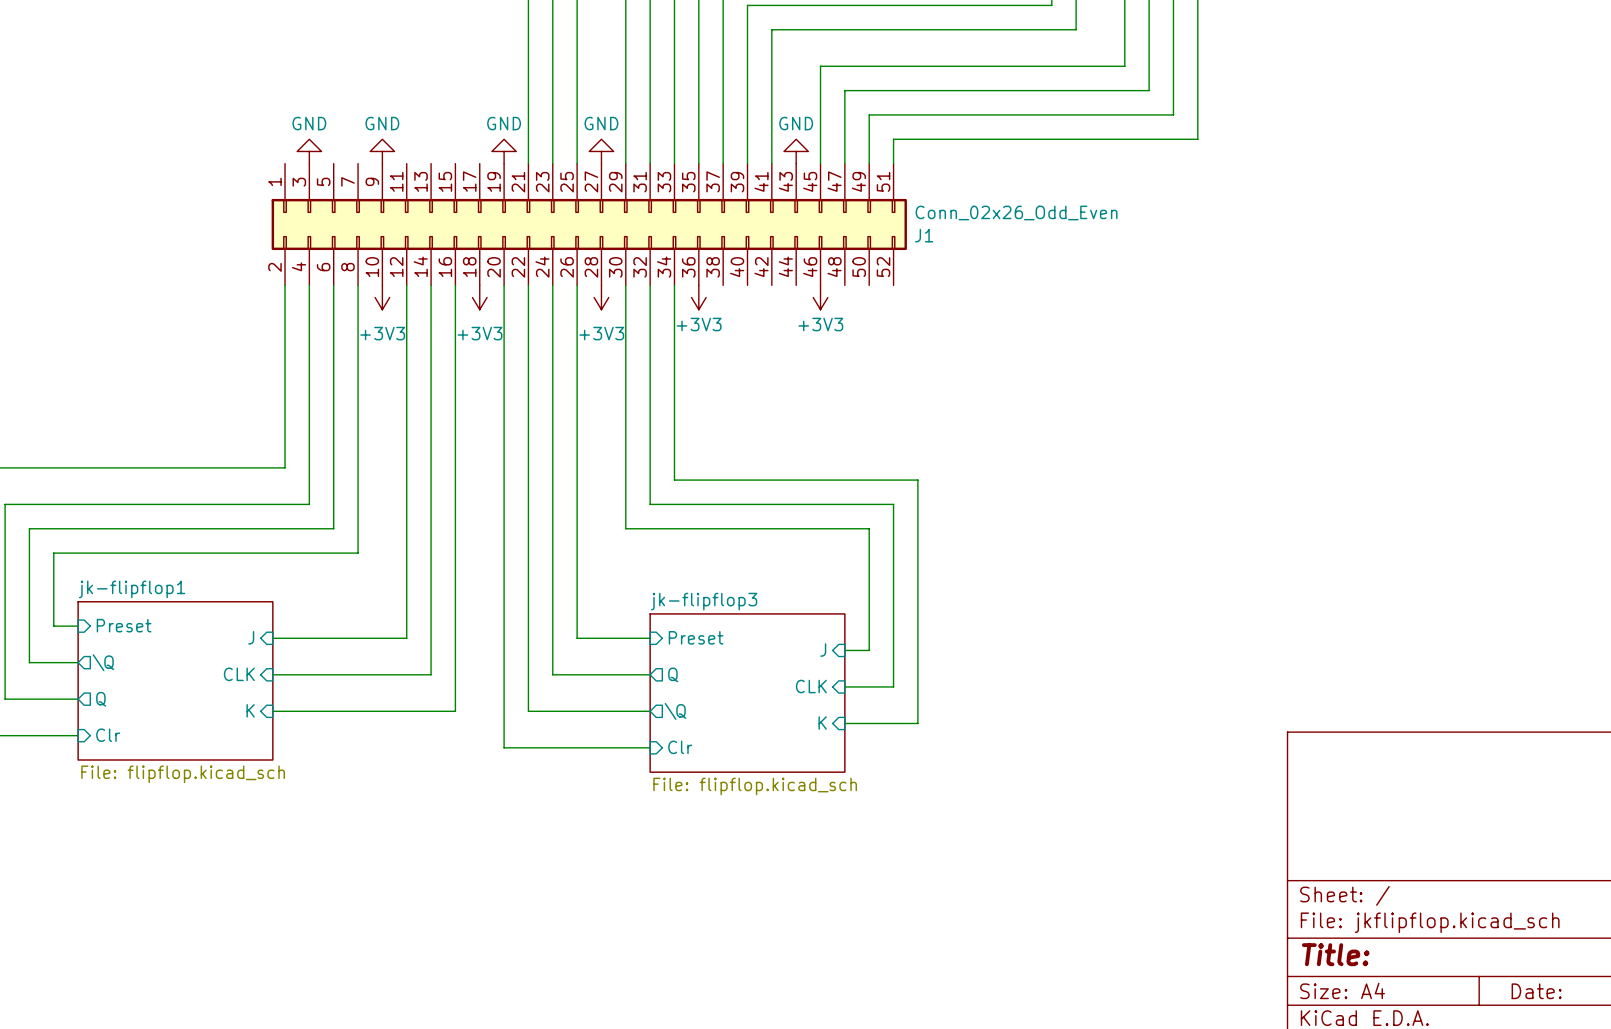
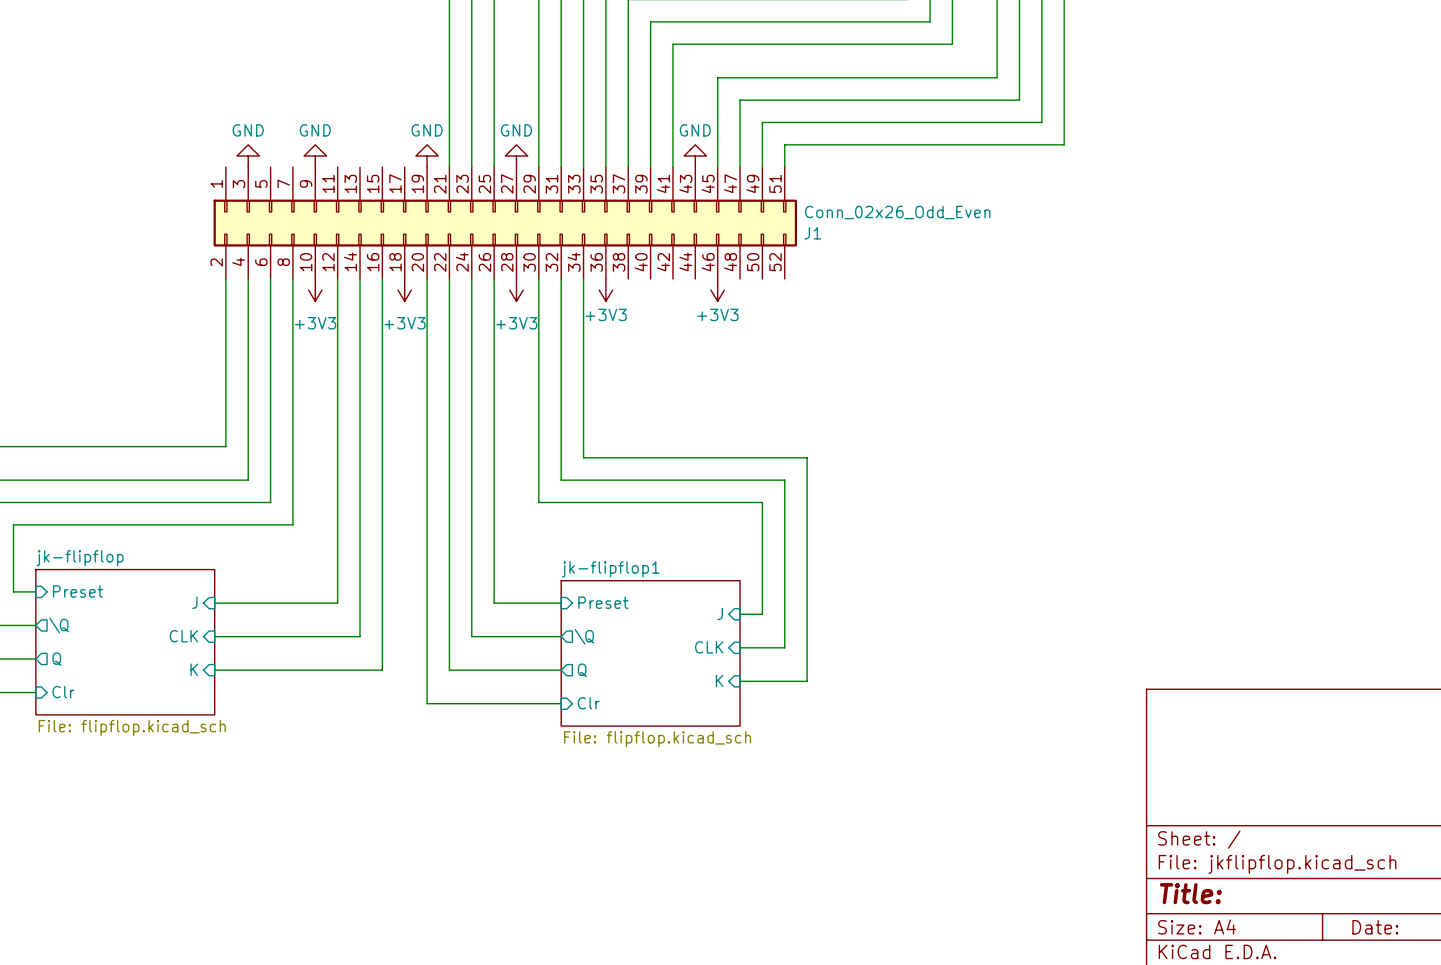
sheet jk-flipflop1 name: jk-flipflop1 (132, 589) -> jk-flipflop (80, 558)
sheet jk-flipflop3 name: jk-flipflop3 (704, 601) -> jk-flipflop1 (610, 569)
sheet pin: Q (673, 674) -> \Q (584, 636)
sheet pin: \Q (675, 711) -> Q (582, 670)

